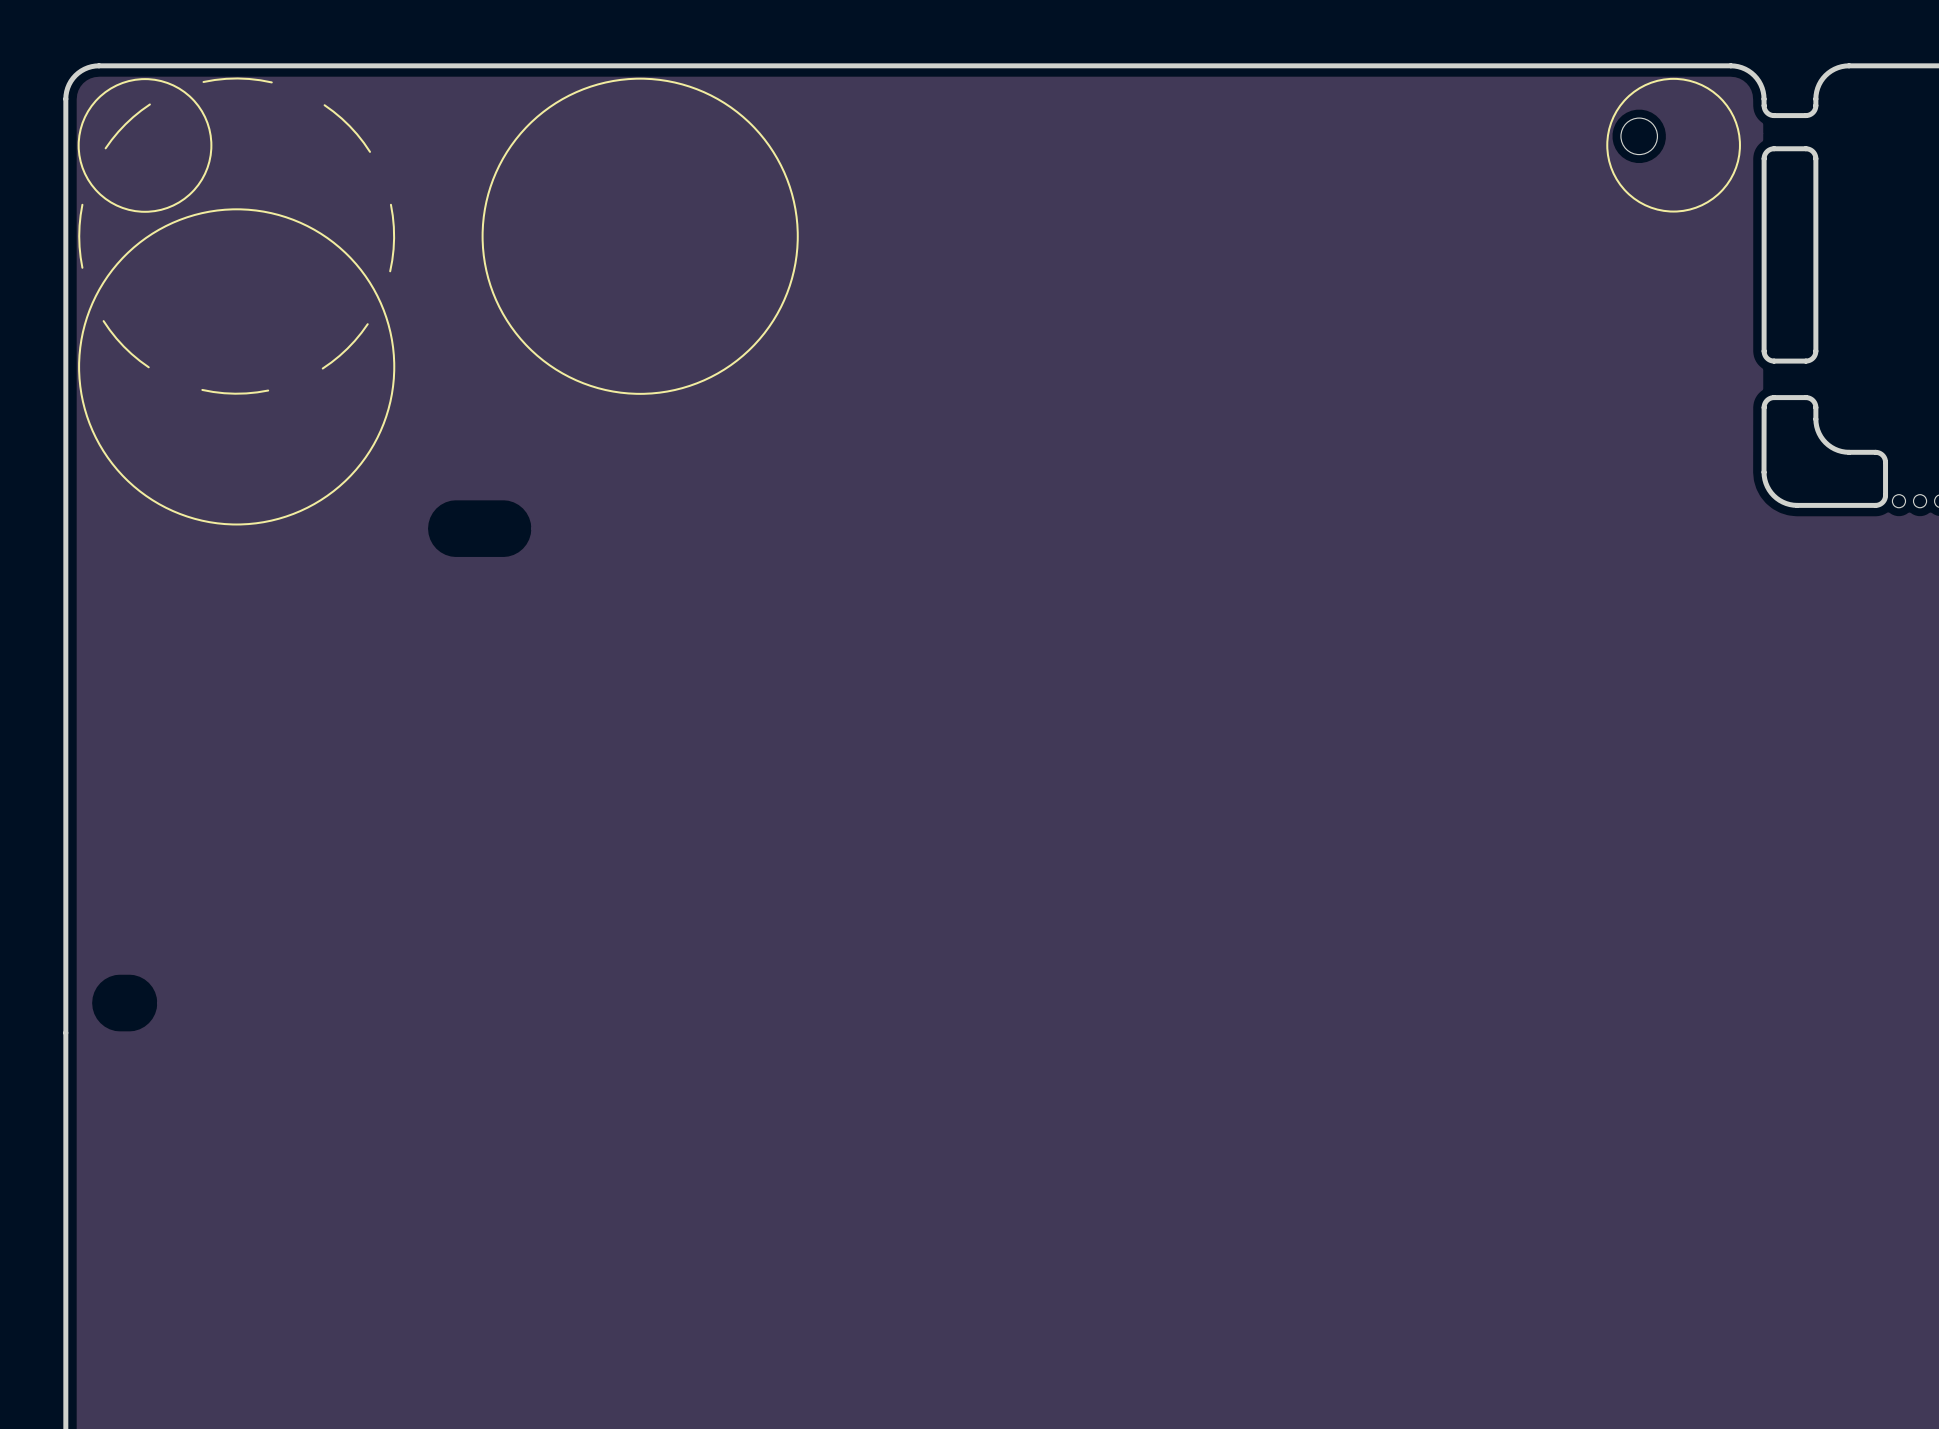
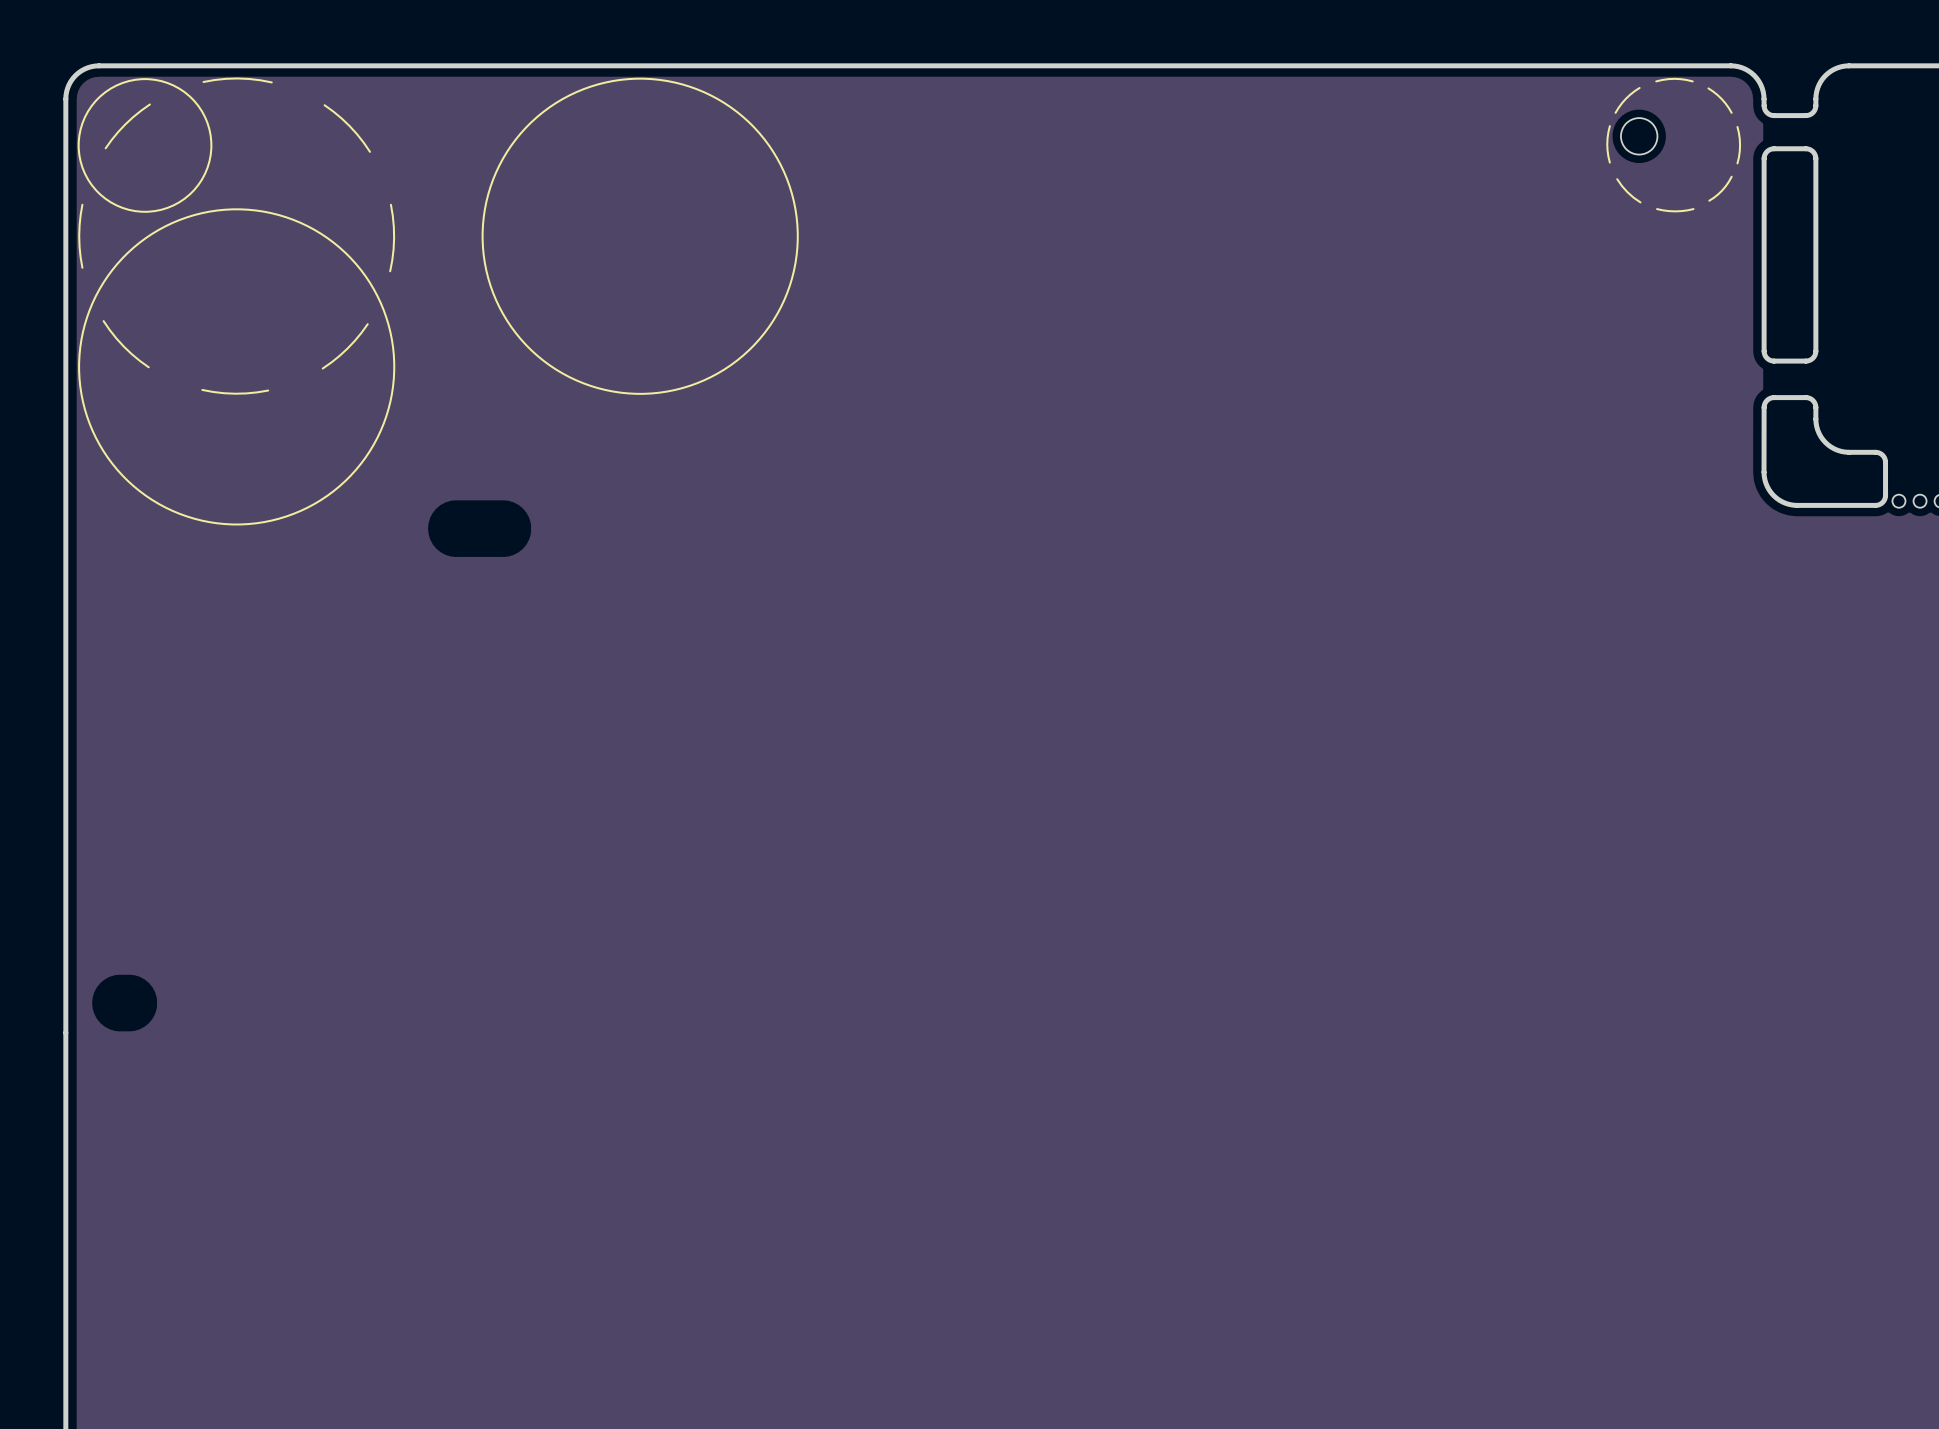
drawing: [1606, 77, 1741, 213] -> none
line: none -> (1692, 81) (1674, 78) (1656, 81)
line: none -> (1639, 87) (1625, 98) (1615, 112)
line: none -> (1708, 88) (1721, 99) (1731, 112)
line: none -> (1609, 126) (1607, 144) (1609, 162)
line: none -> (1737, 126) (1740, 145) (1737, 163)
line: none -> (1731, 176) (1722, 190) (1709, 200)
line: none -> (1617, 179) (1627, 192) (1640, 202)
line: none -> (1693, 209) (1675, 211) (1657, 209)

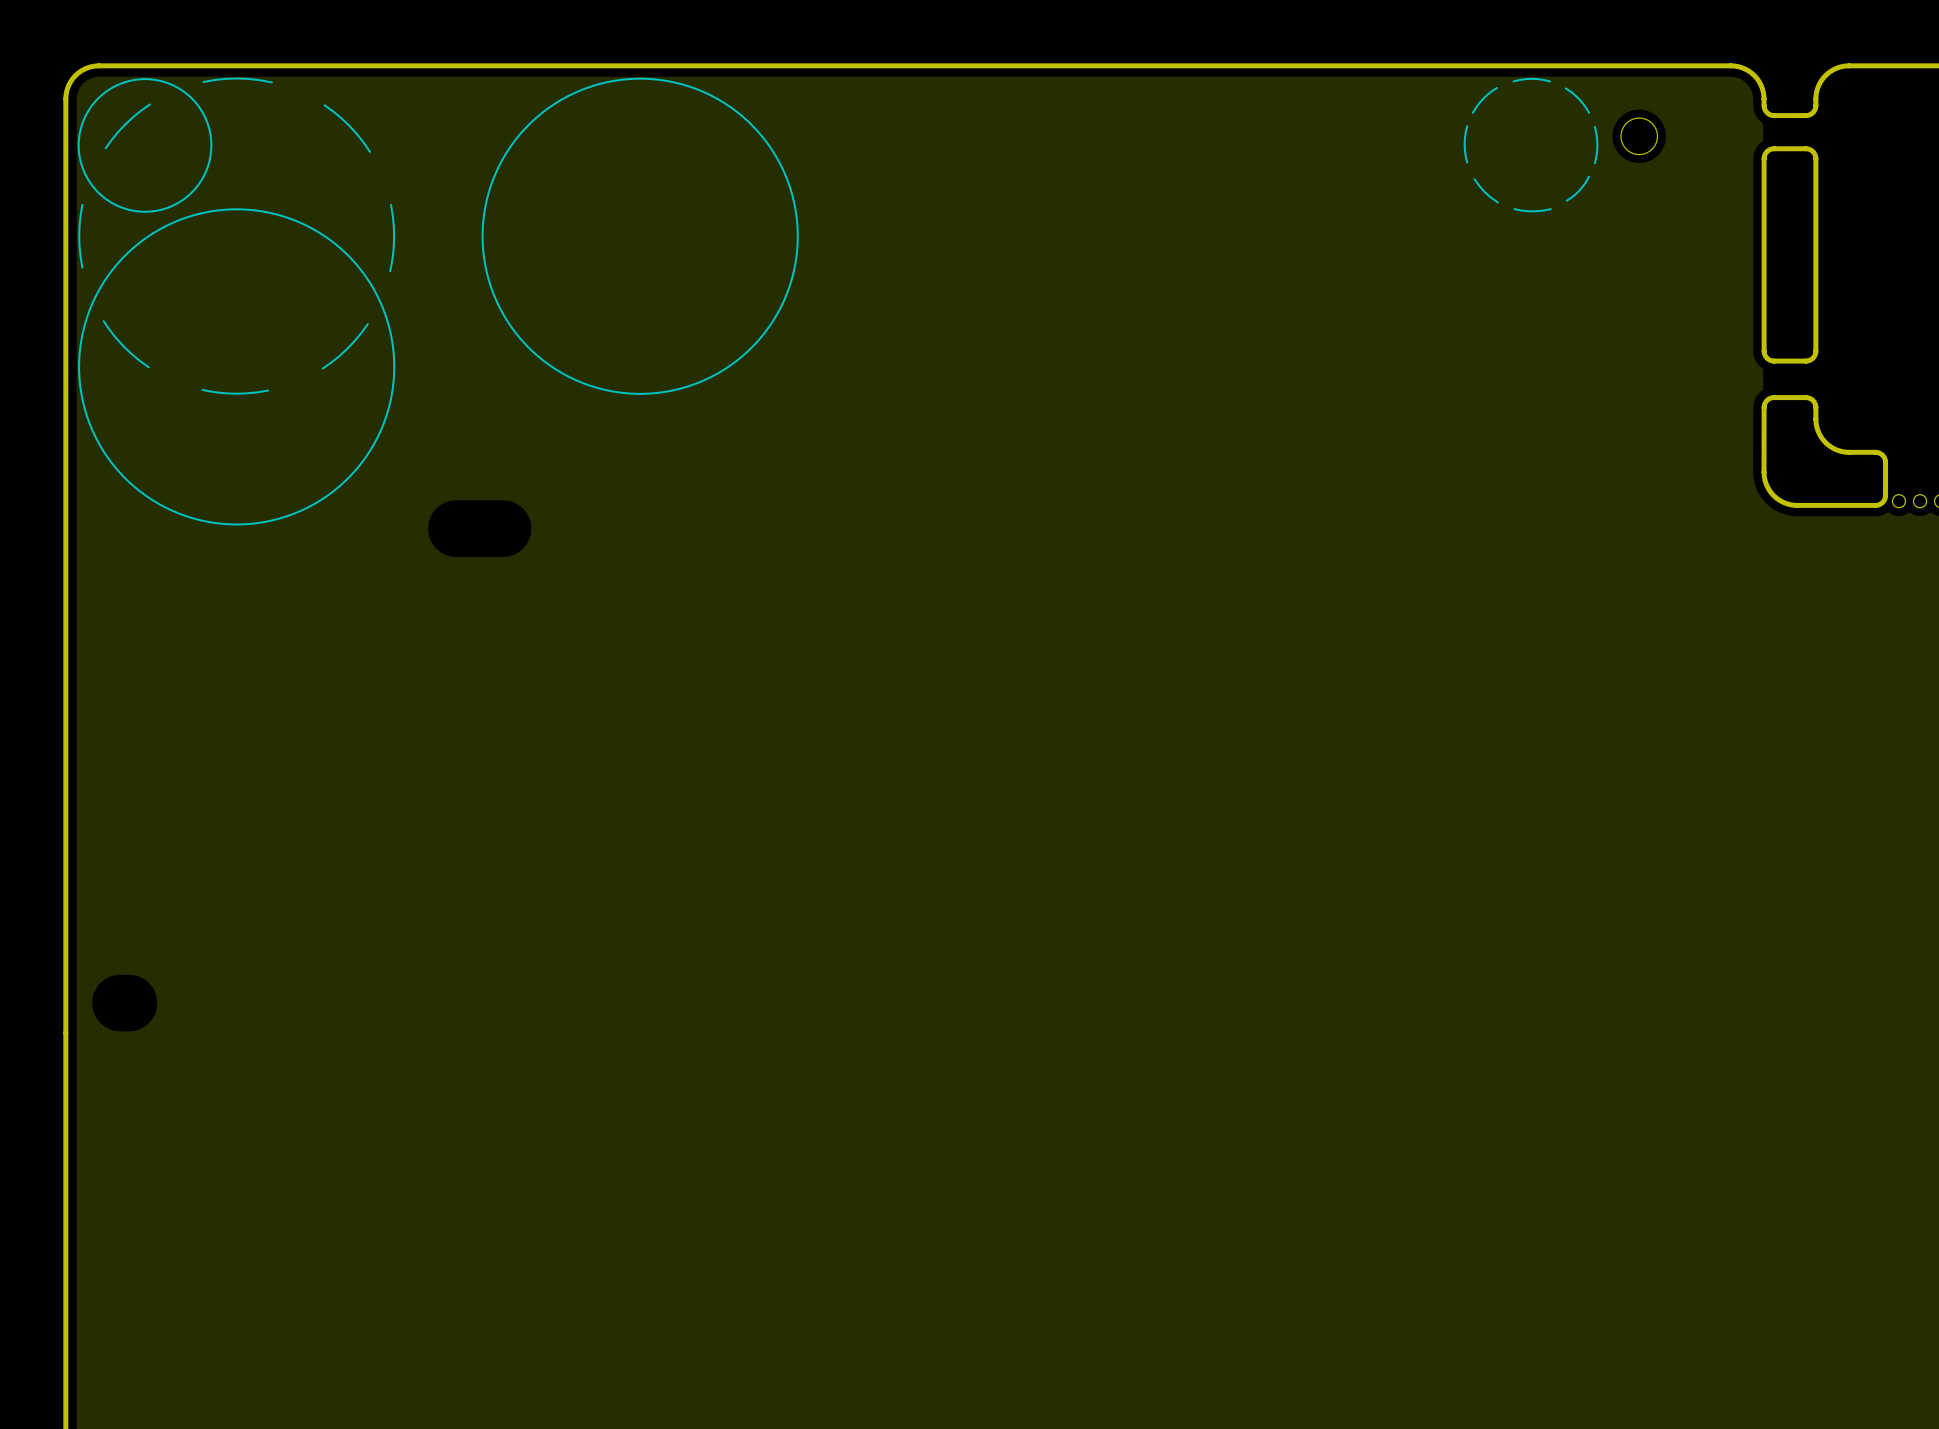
line: (1692, 81) (1674, 78) (1656, 81) -> (1550, 81) (1531, 78) (1513, 81)
line: (1639, 87) (1625, 98) (1615, 112) -> (1496, 87) (1483, 98) (1472, 112)
line: (1708, 88) (1721, 99) (1731, 112) -> (1565, 88) (1579, 99) (1589, 112)
line: (1609, 126) (1607, 144) (1609, 162) -> (1467, 126) (1464, 144) (1467, 162)
line: (1737, 126) (1740, 145) (1737, 163) -> (1594, 126) (1597, 145) (1594, 163)
line: (1731, 176) (1722, 190) (1709, 200) -> (1589, 176) (1579, 190) (1566, 200)
line: (1617, 179) (1627, 192) (1640, 202) -> (1474, 179) (1484, 192) (1497, 202)
line: (1693, 209) (1675, 211) (1657, 209) -> (1550, 209) (1532, 211) (1514, 209)

